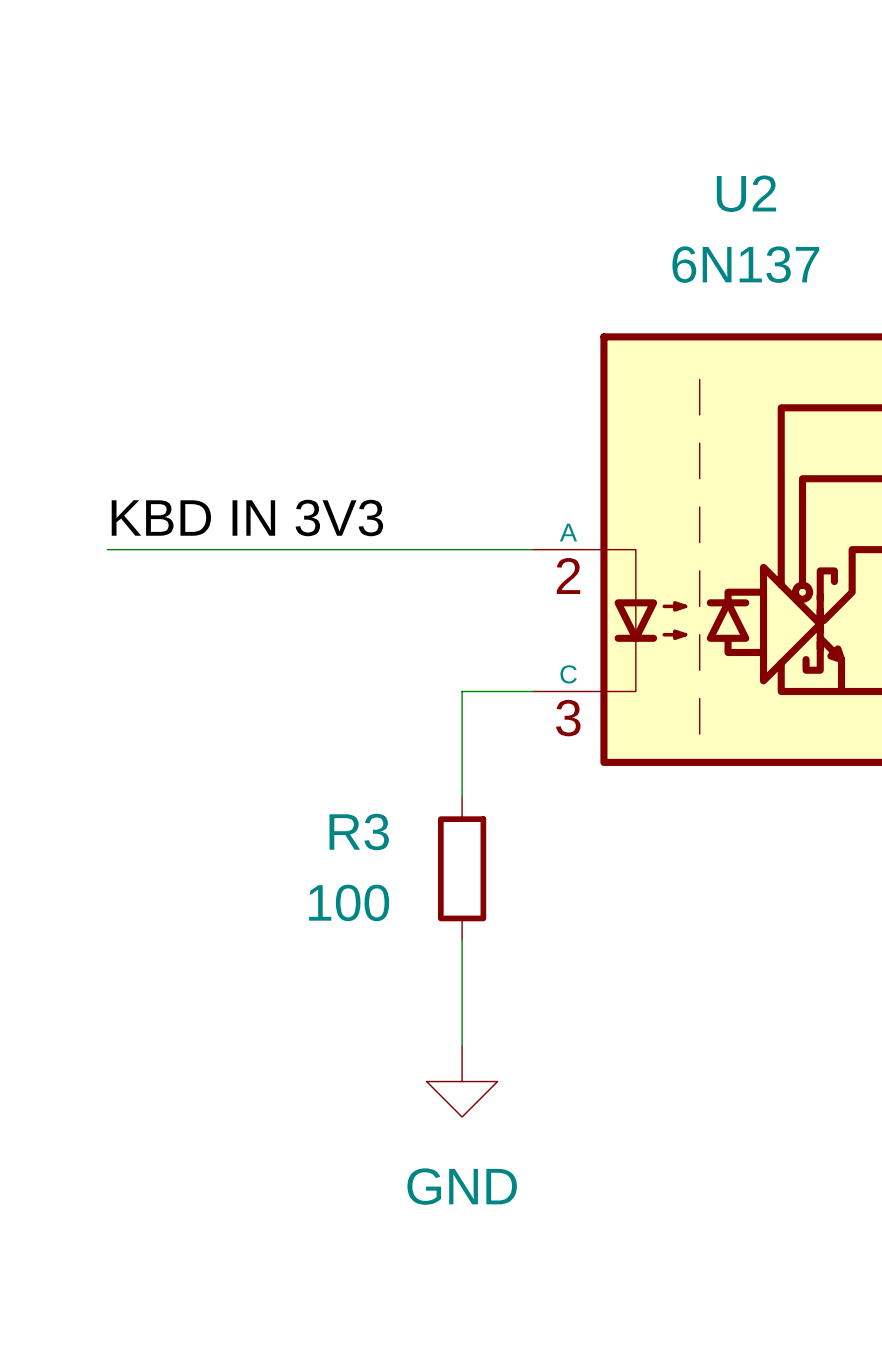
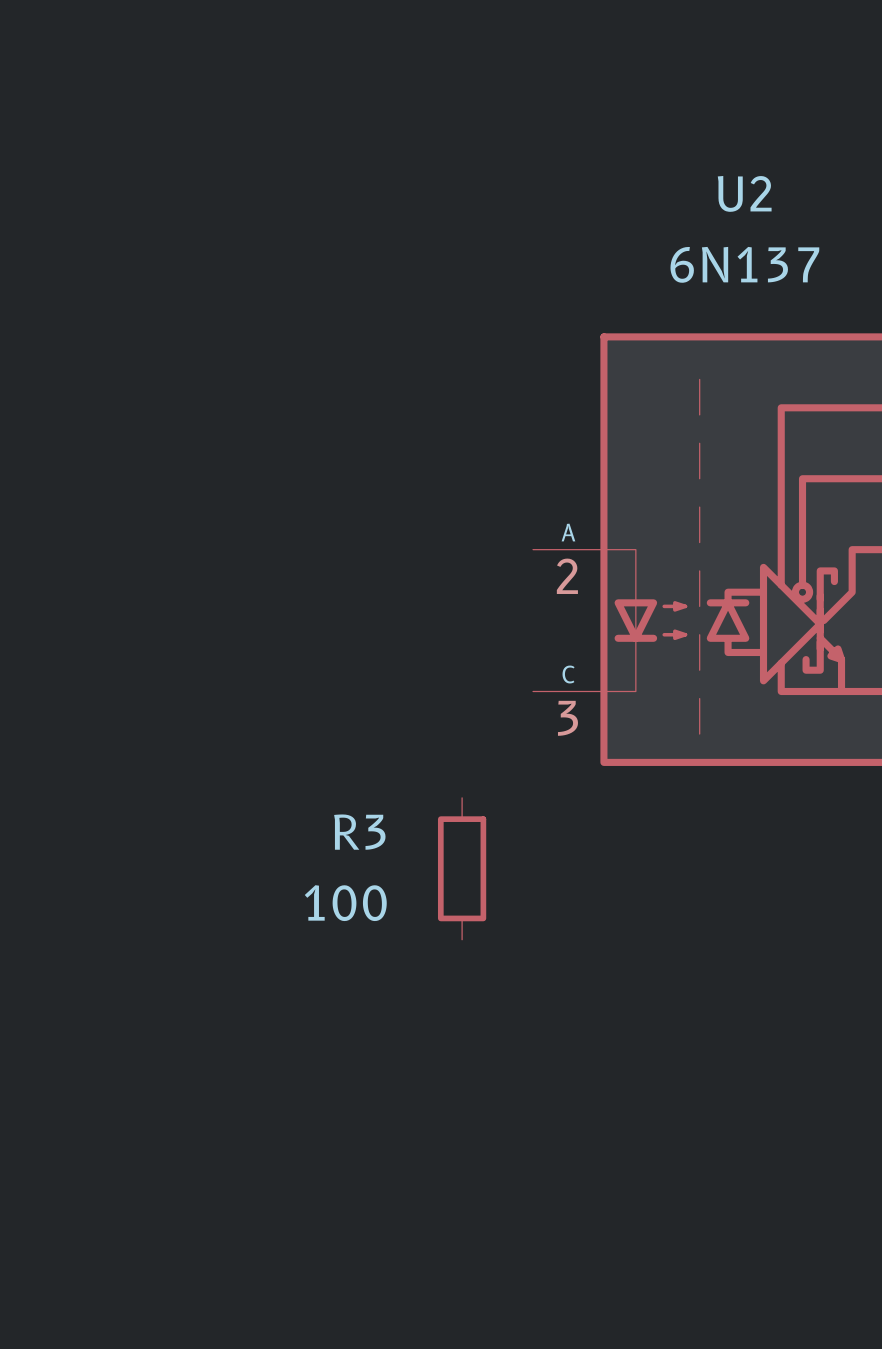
label: KBD IN 3V3 (247, 517) -> none
wire: (107, 549) (533, 549) -> none
wire: (533, 691) (462, 691) (462, 797) -> none
wire: (462, 939) (462, 1046) -> none
power symbol: GND (462, 1081) -> none

